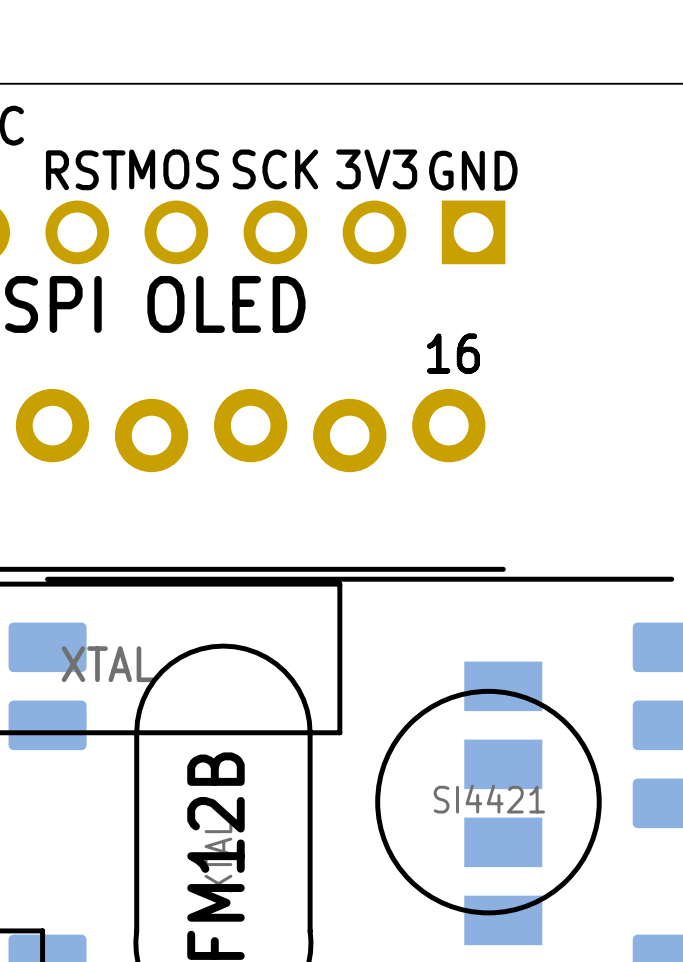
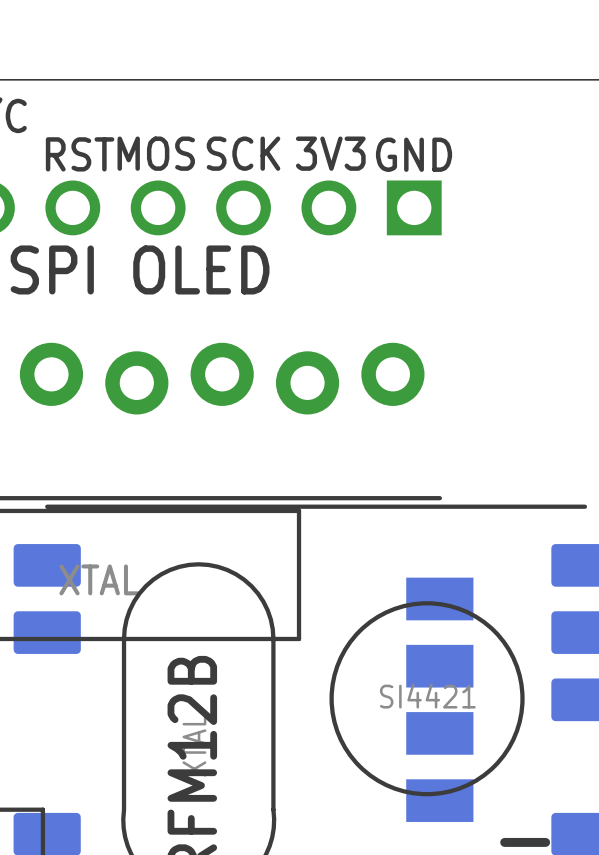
text: 16 (453, 353) -> none

